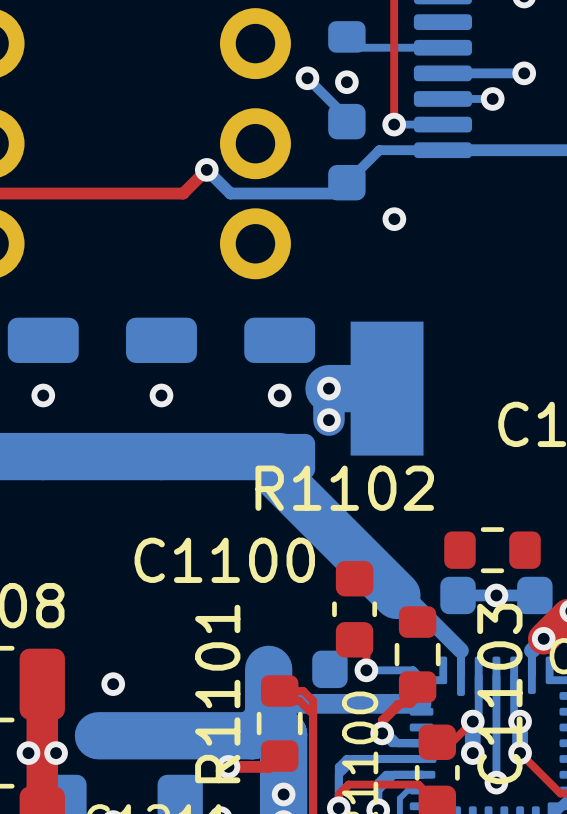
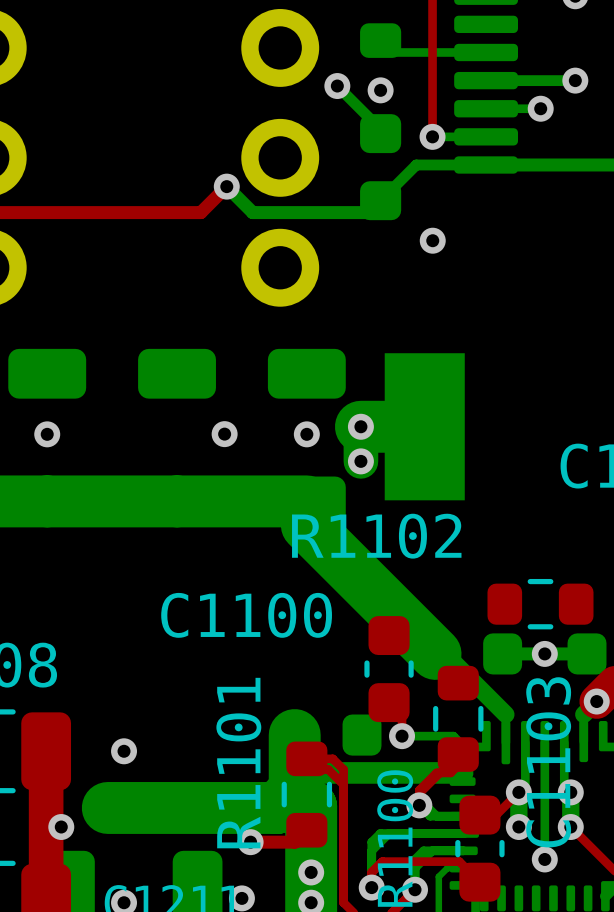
via position: (161, 395) -> (224, 434)
via: (28, 753) -> none

